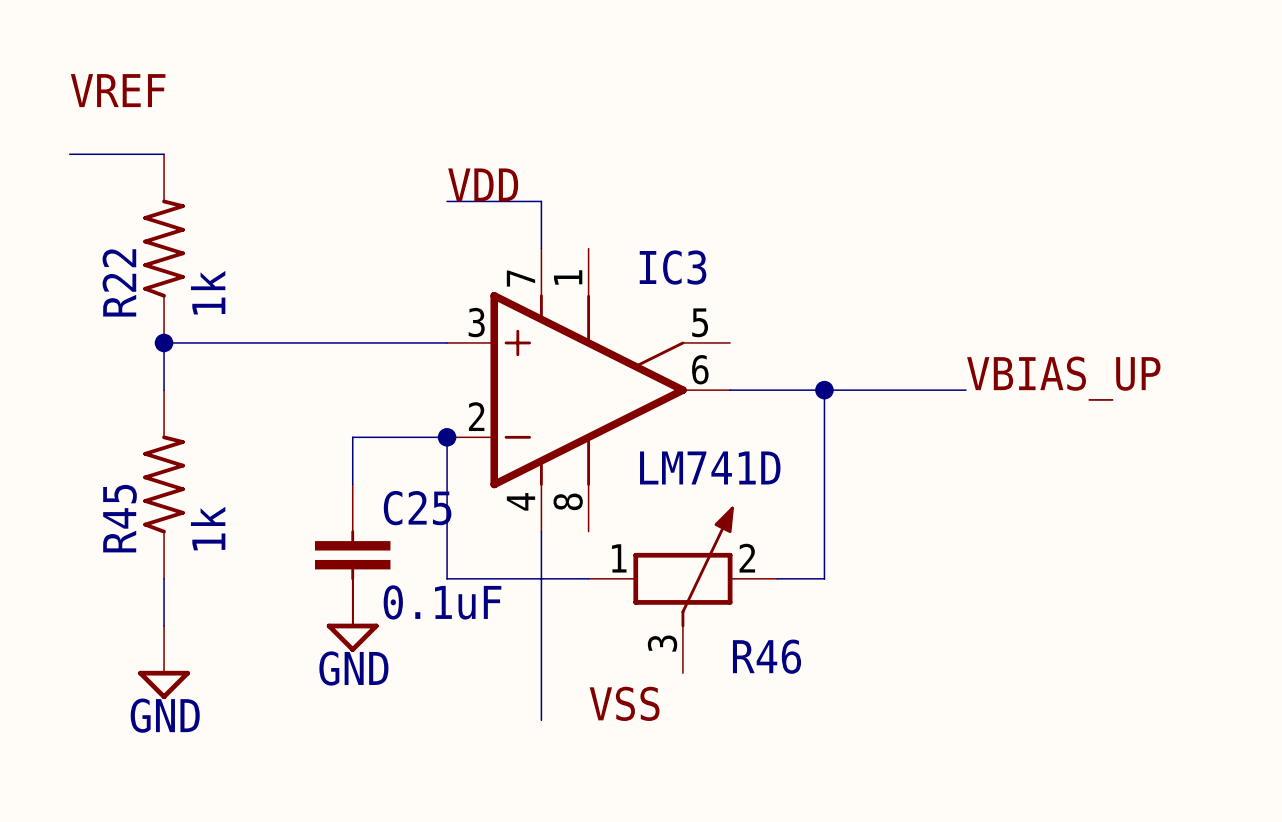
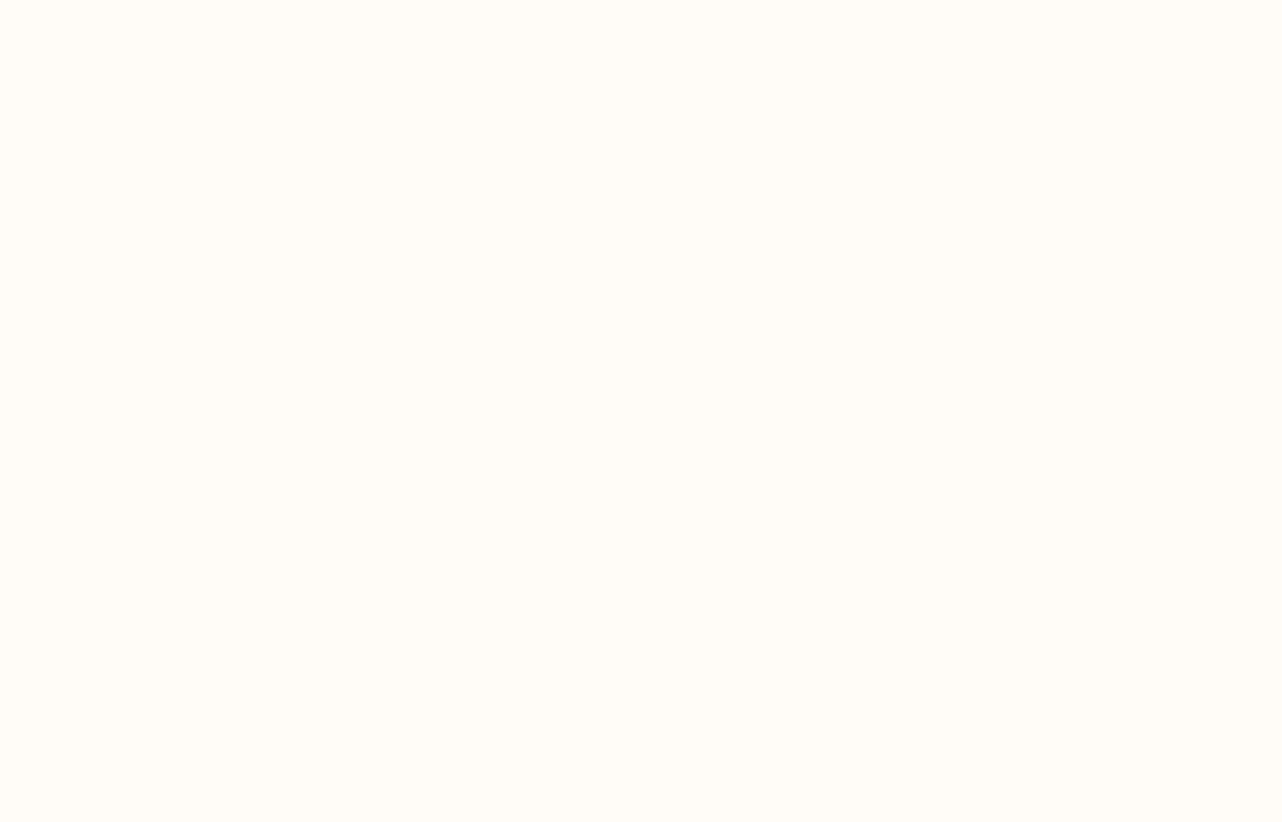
label: VREF (118, 90) -> none
wire: (69, 154) (164, 154) -> none
label: VDD (483, 184) -> none
wire: (447, 201) (541, 201) (541, 248) -> none
R22: 1k (164, 248) -> none
junction: (164, 342) -> none
wire: (447, 342) (164, 342) (164, 390) -> none
label: VBIAS_UP (1063, 378) -> none
IC3: LM741D (588, 390) -> none
wire: (730, 390) (965, 390) -> none
wire: (824, 390) (824, 578) (777, 578) -> none
junction: (824, 390) -> none
junction: (447, 437) -> none
R45: 1k (164, 484) -> none
wire: (352, 484) (352, 437) (447, 437) (447, 578) (588, 578) -> none
wire: (541, 531) (541, 720) -> none
C25: 0.1uF (352, 555) -> none
wire: (164, 578) (164, 626) -> none
R46: (682, 589) -> none
power symbol: GND (352, 615) -> none
power symbol: GND (164, 662) -> none
label: VSS (624, 703) -> none

